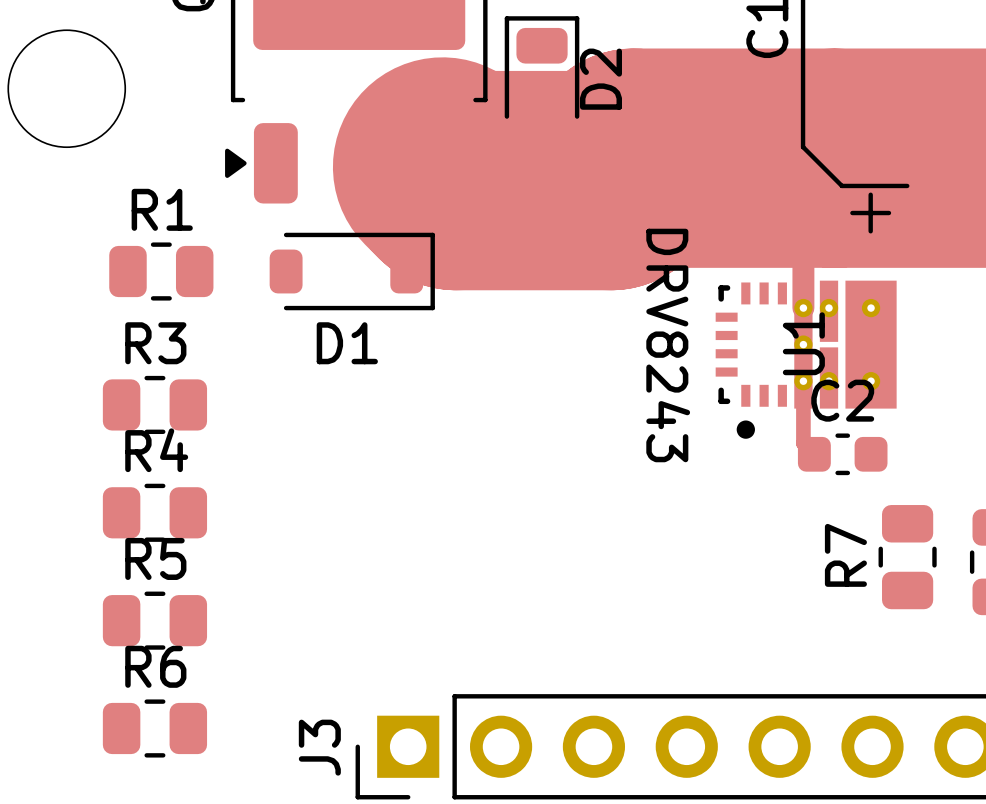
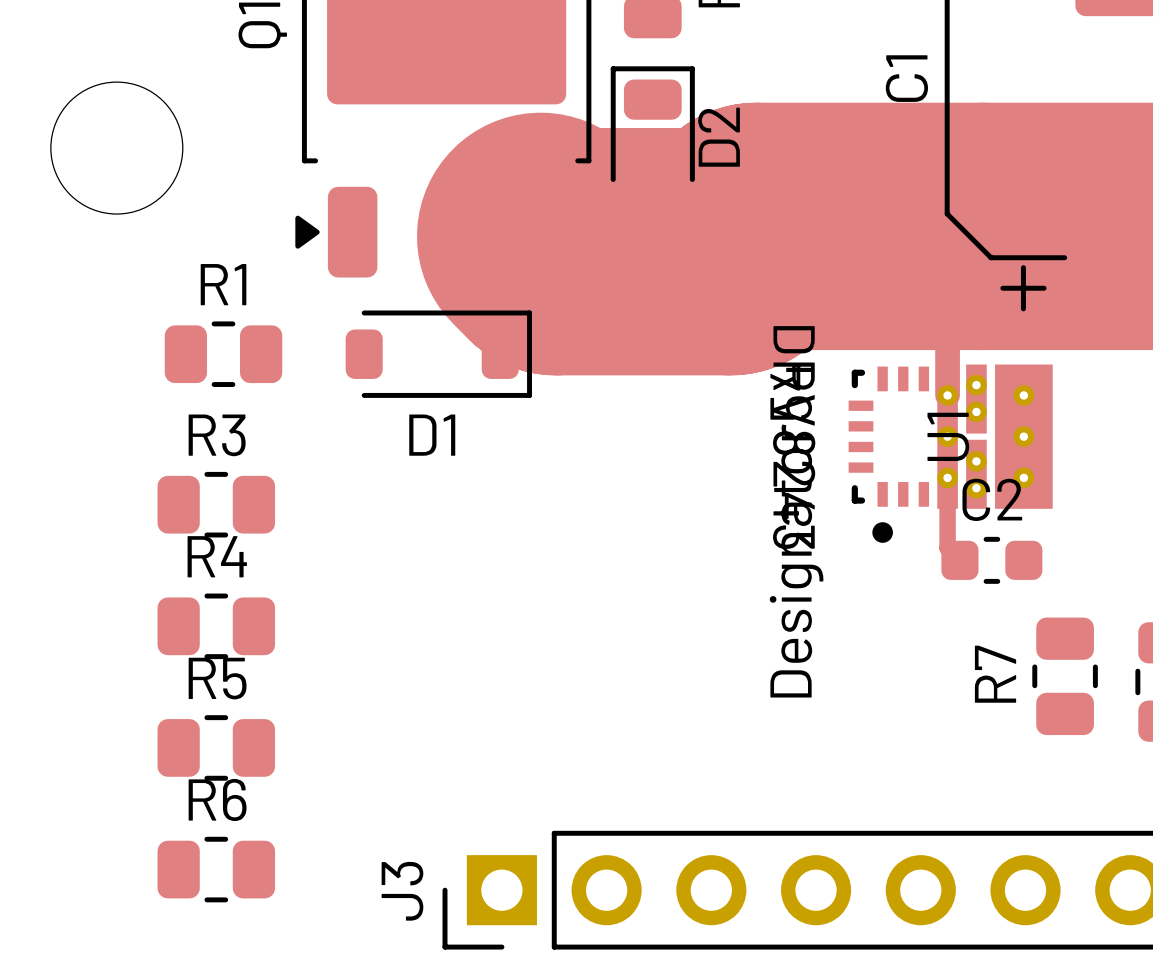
U1 footprint: [715, 280, 897, 439] -> [848, 364, 1053, 543]

